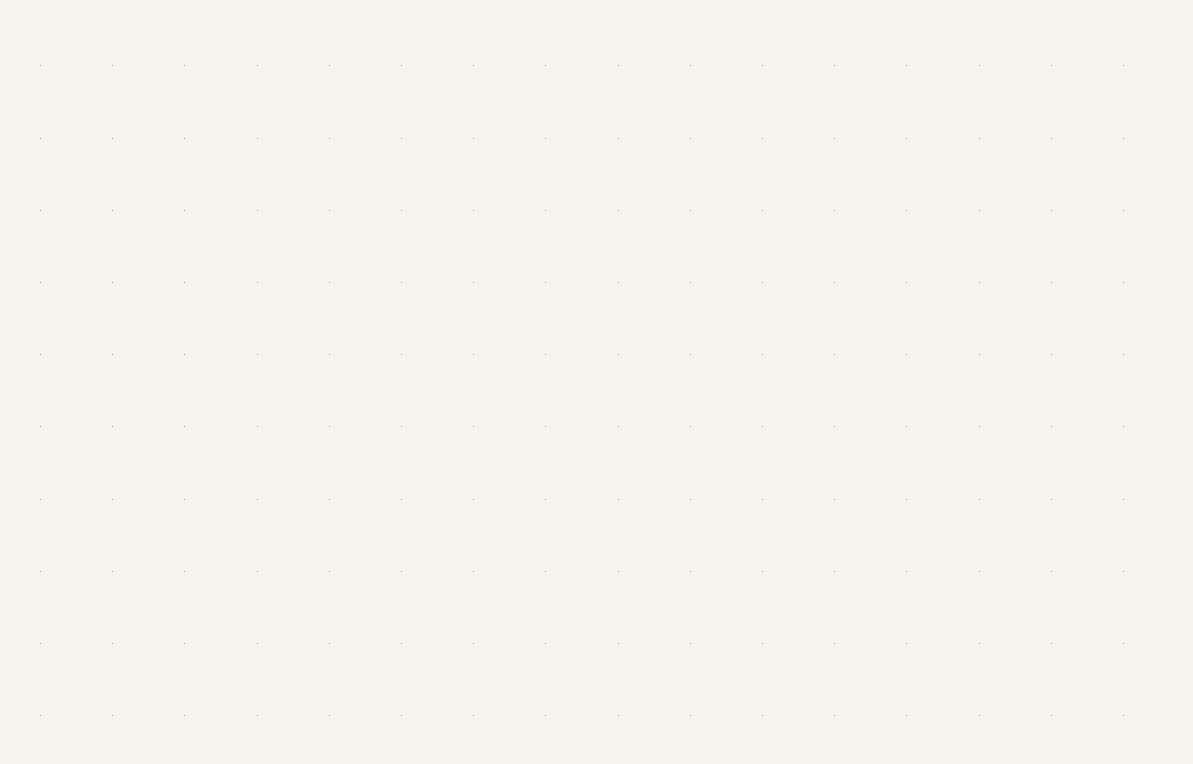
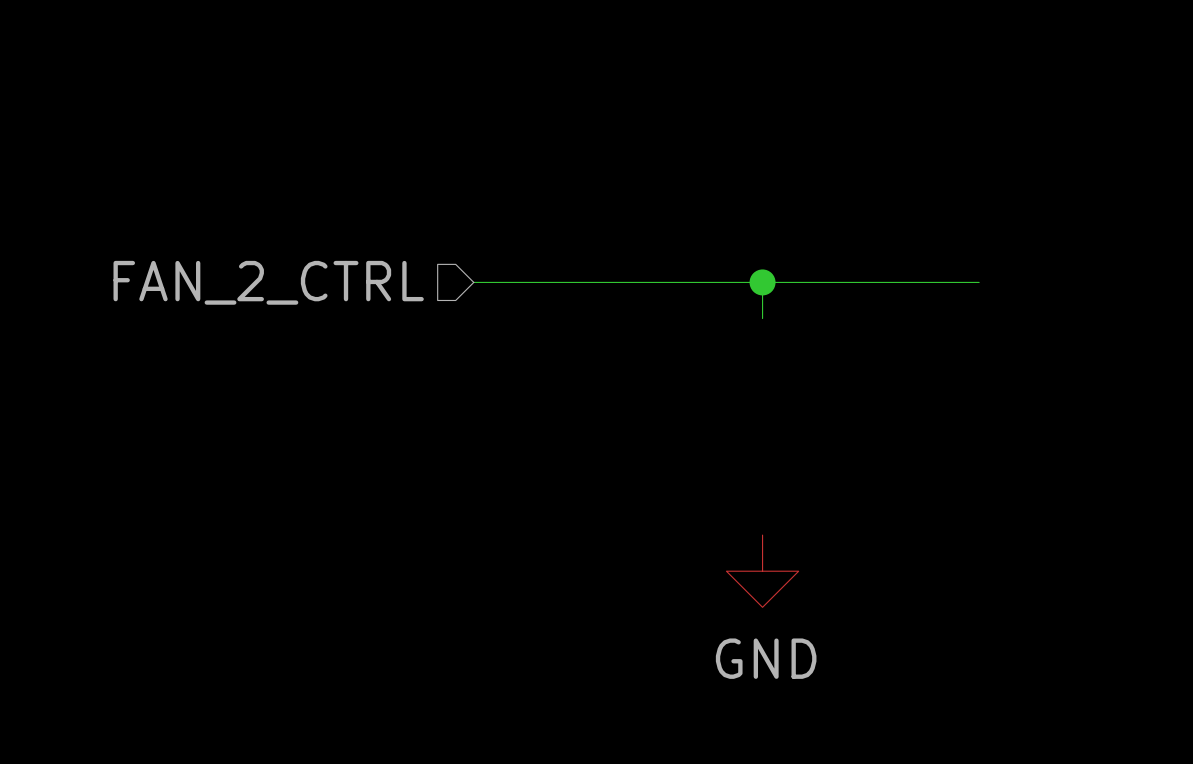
wire: none -> (473, 282) (979, 282)
wire: none -> (762, 282) (762, 318)
junction: none -> (762, 282)
hierarchical label: none -> FAN_2_CTRL (268, 282)
power symbol: none -> GND (762, 571)

